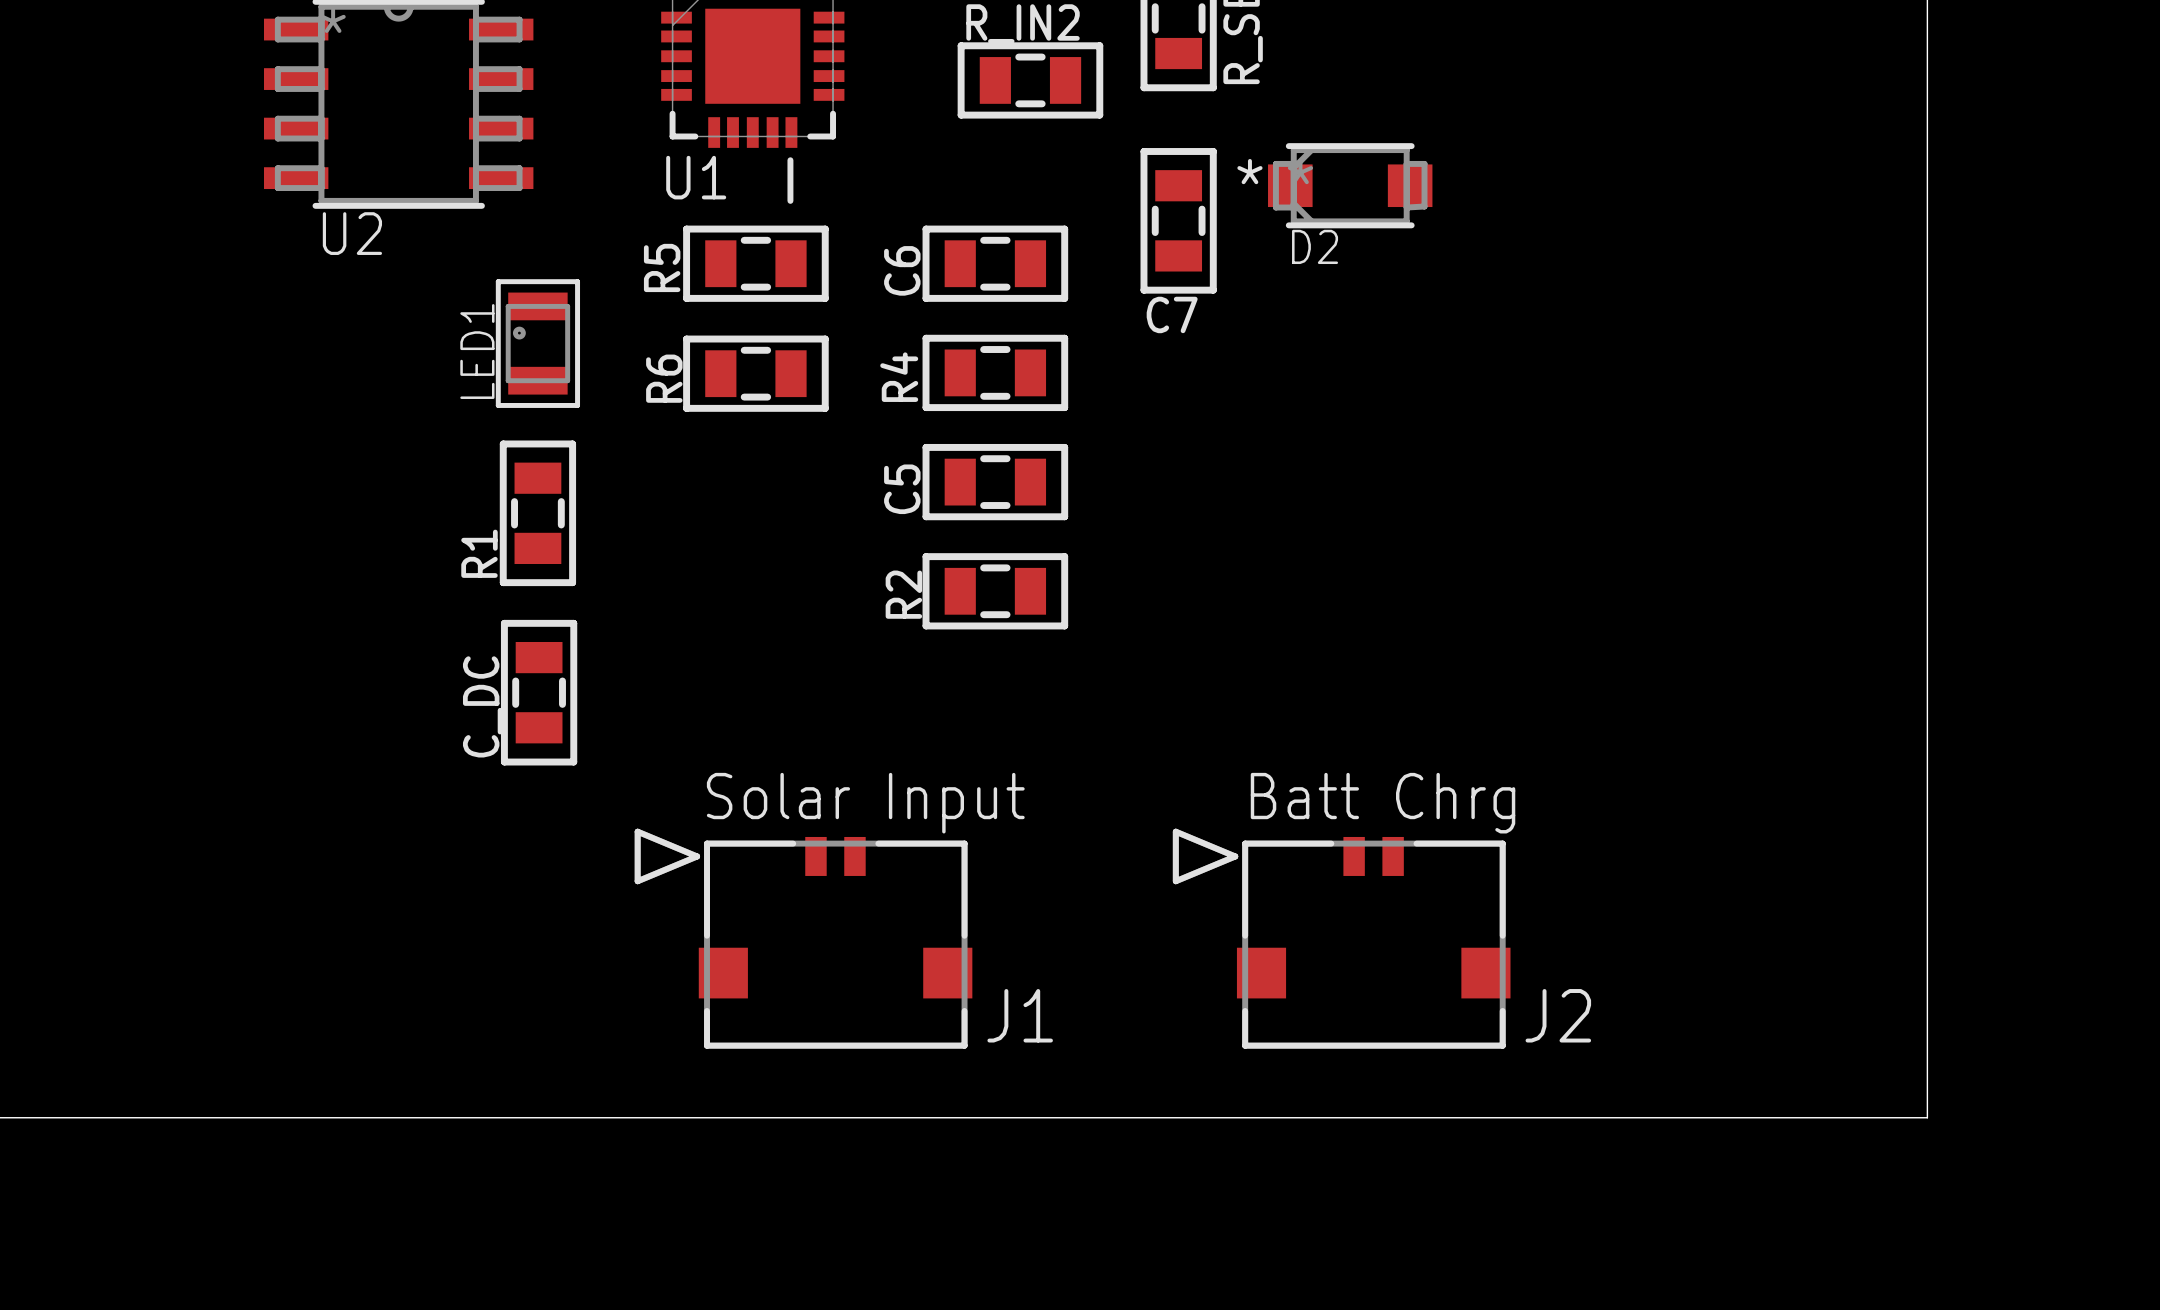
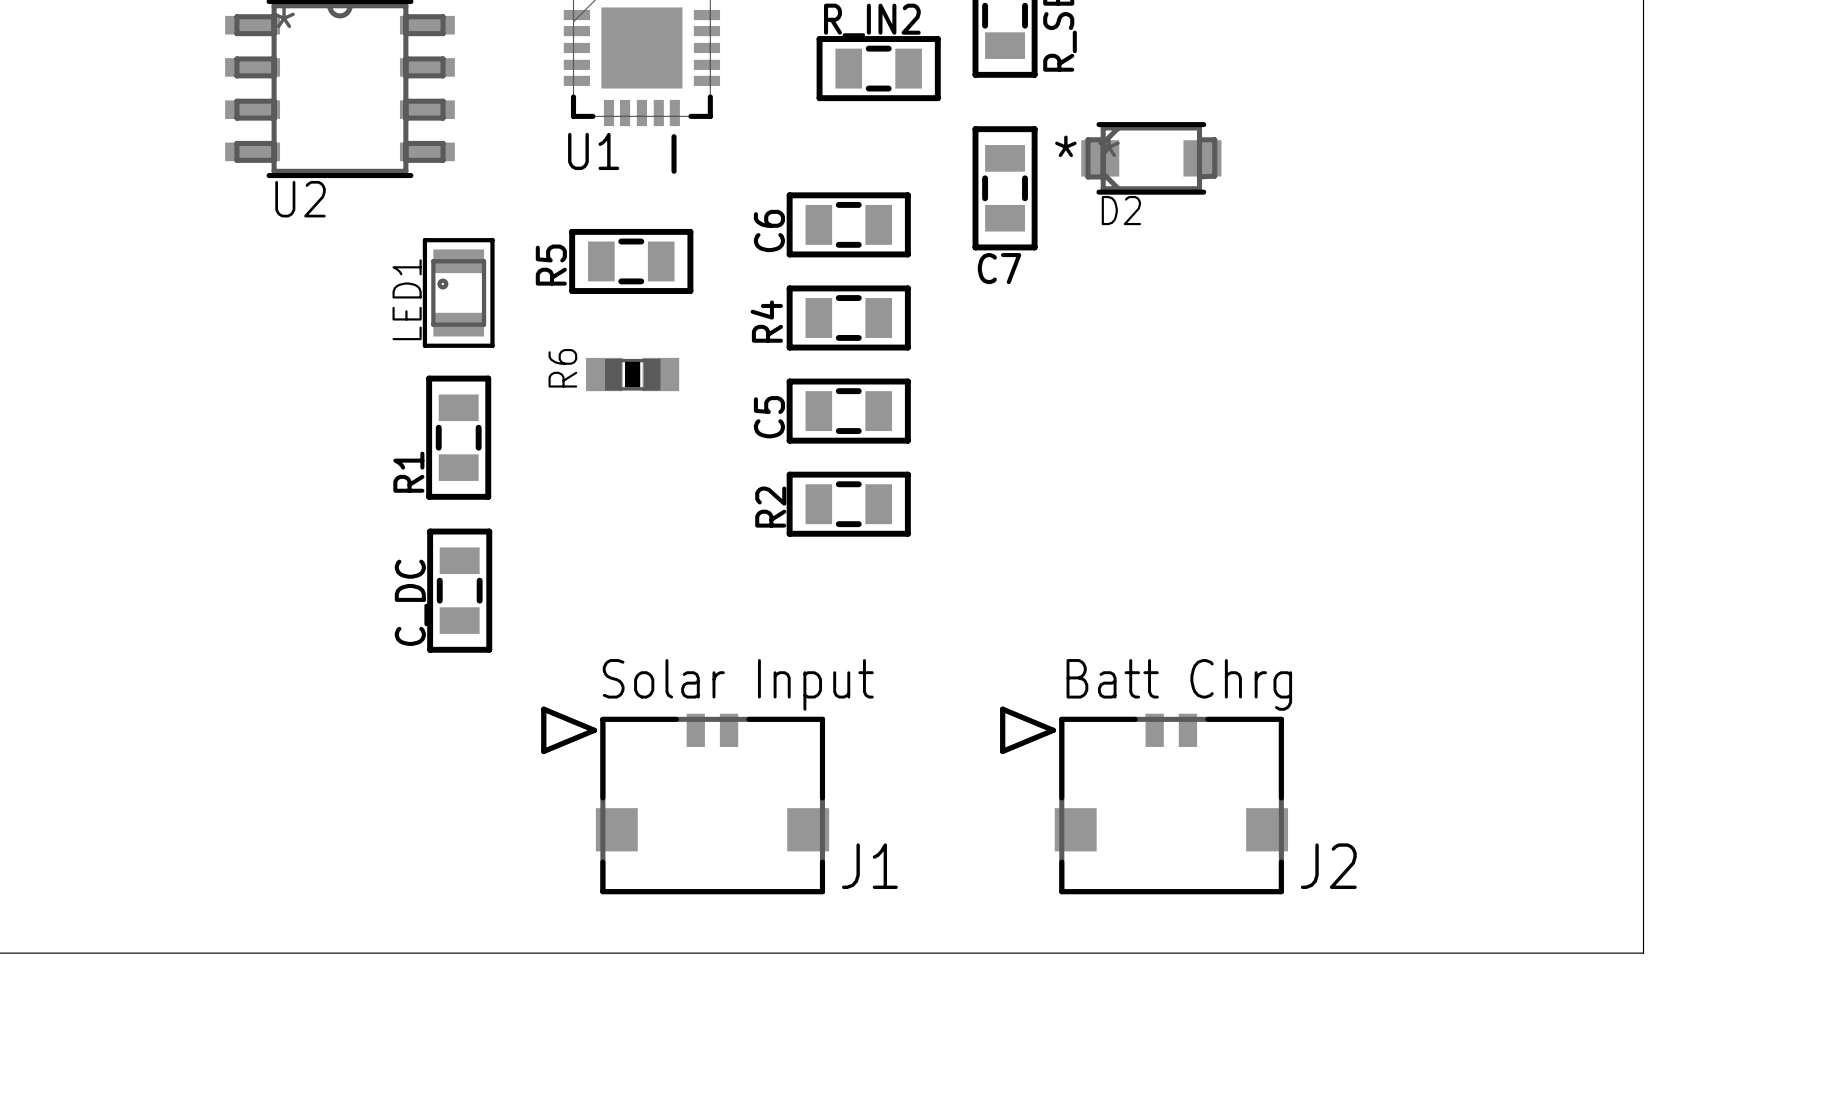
R5 position: (755, 263) -> (631, 261)
R6 footprint: [683, 335, 829, 412] -> [586, 357, 680, 392]

